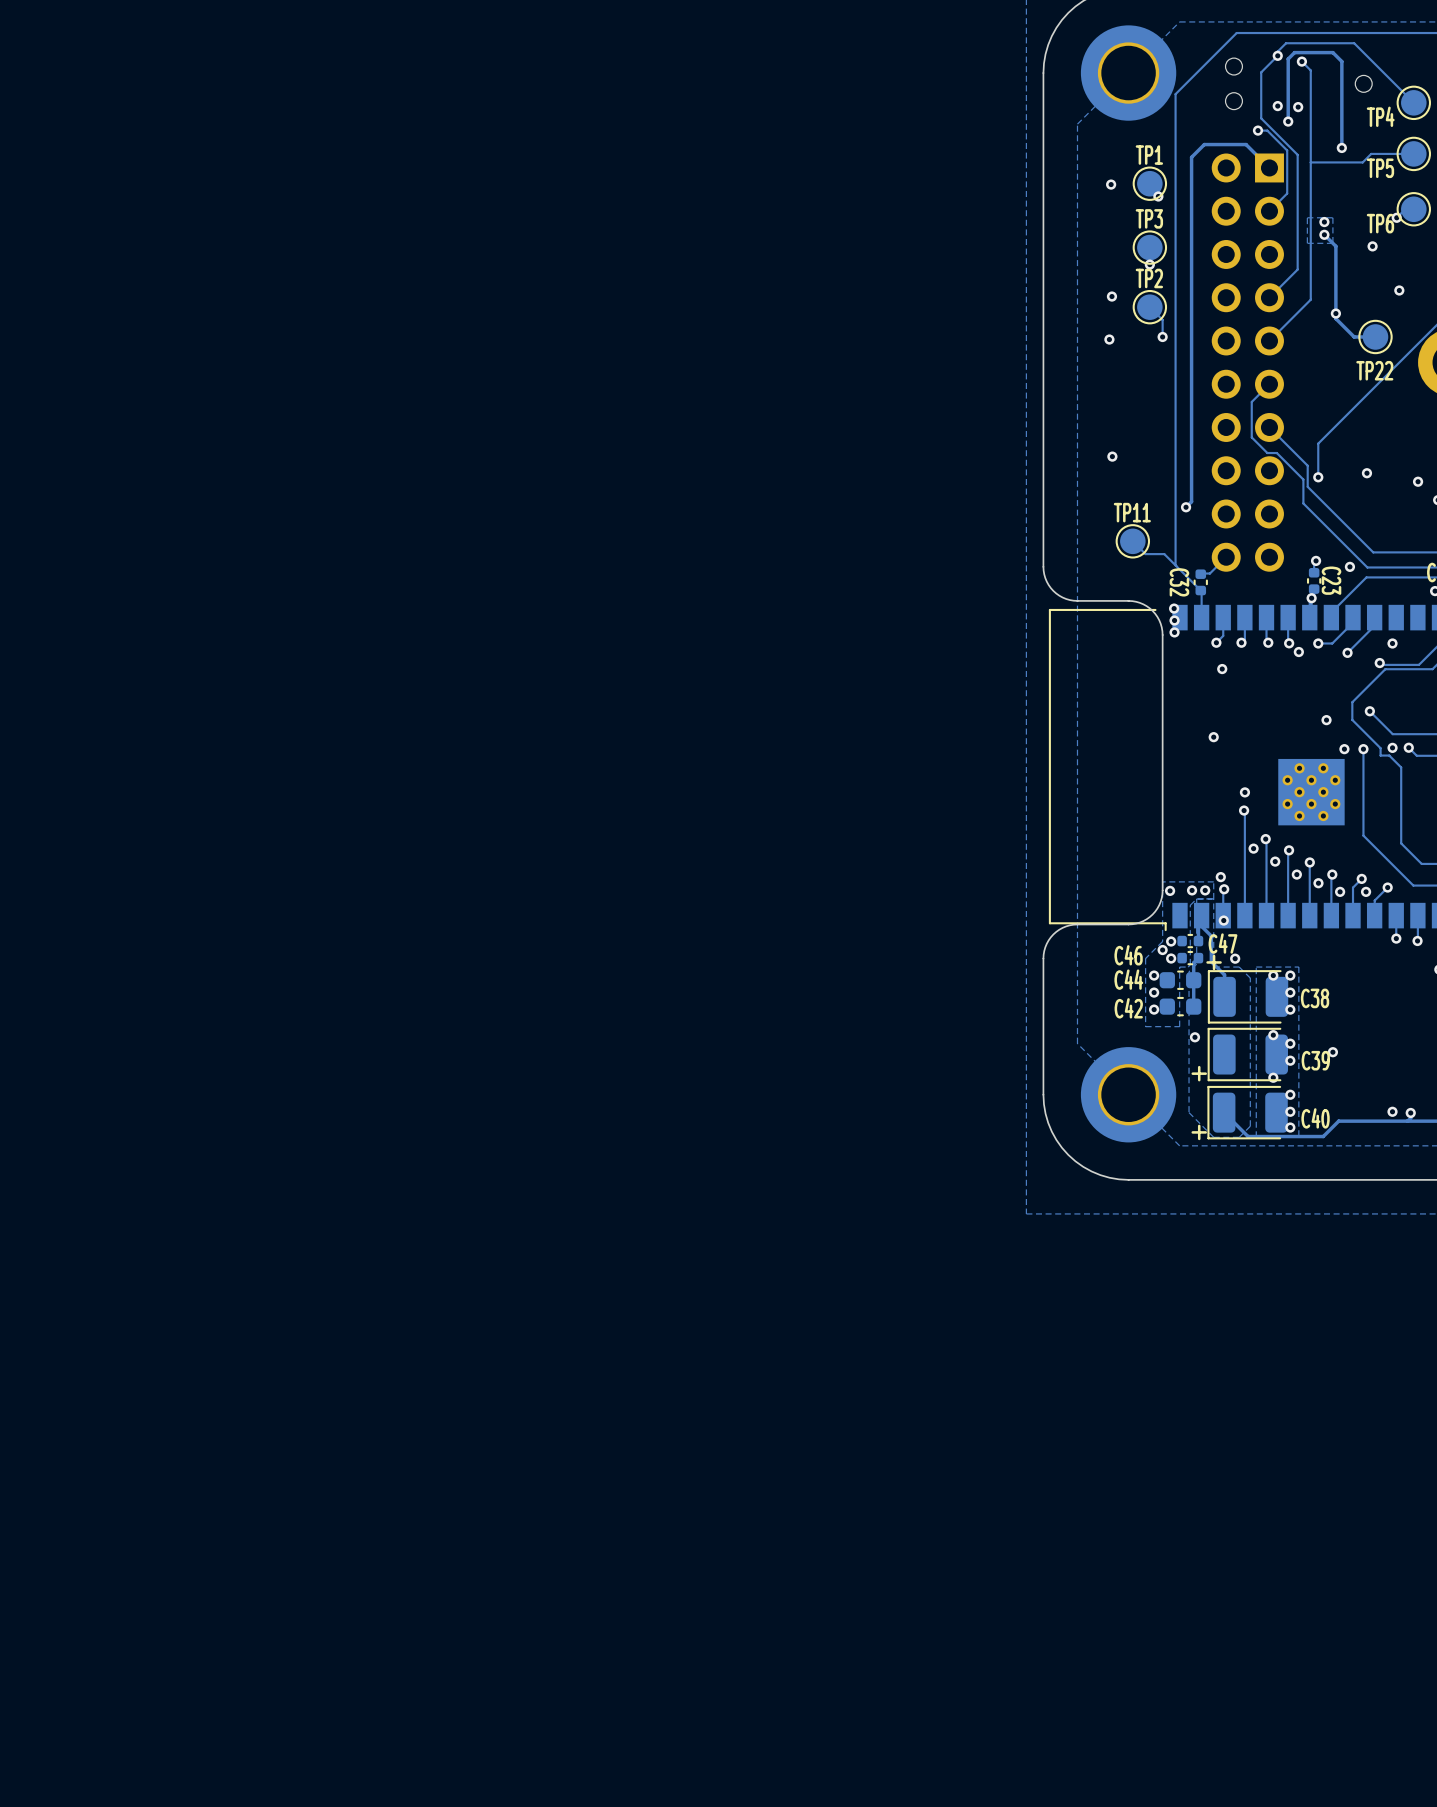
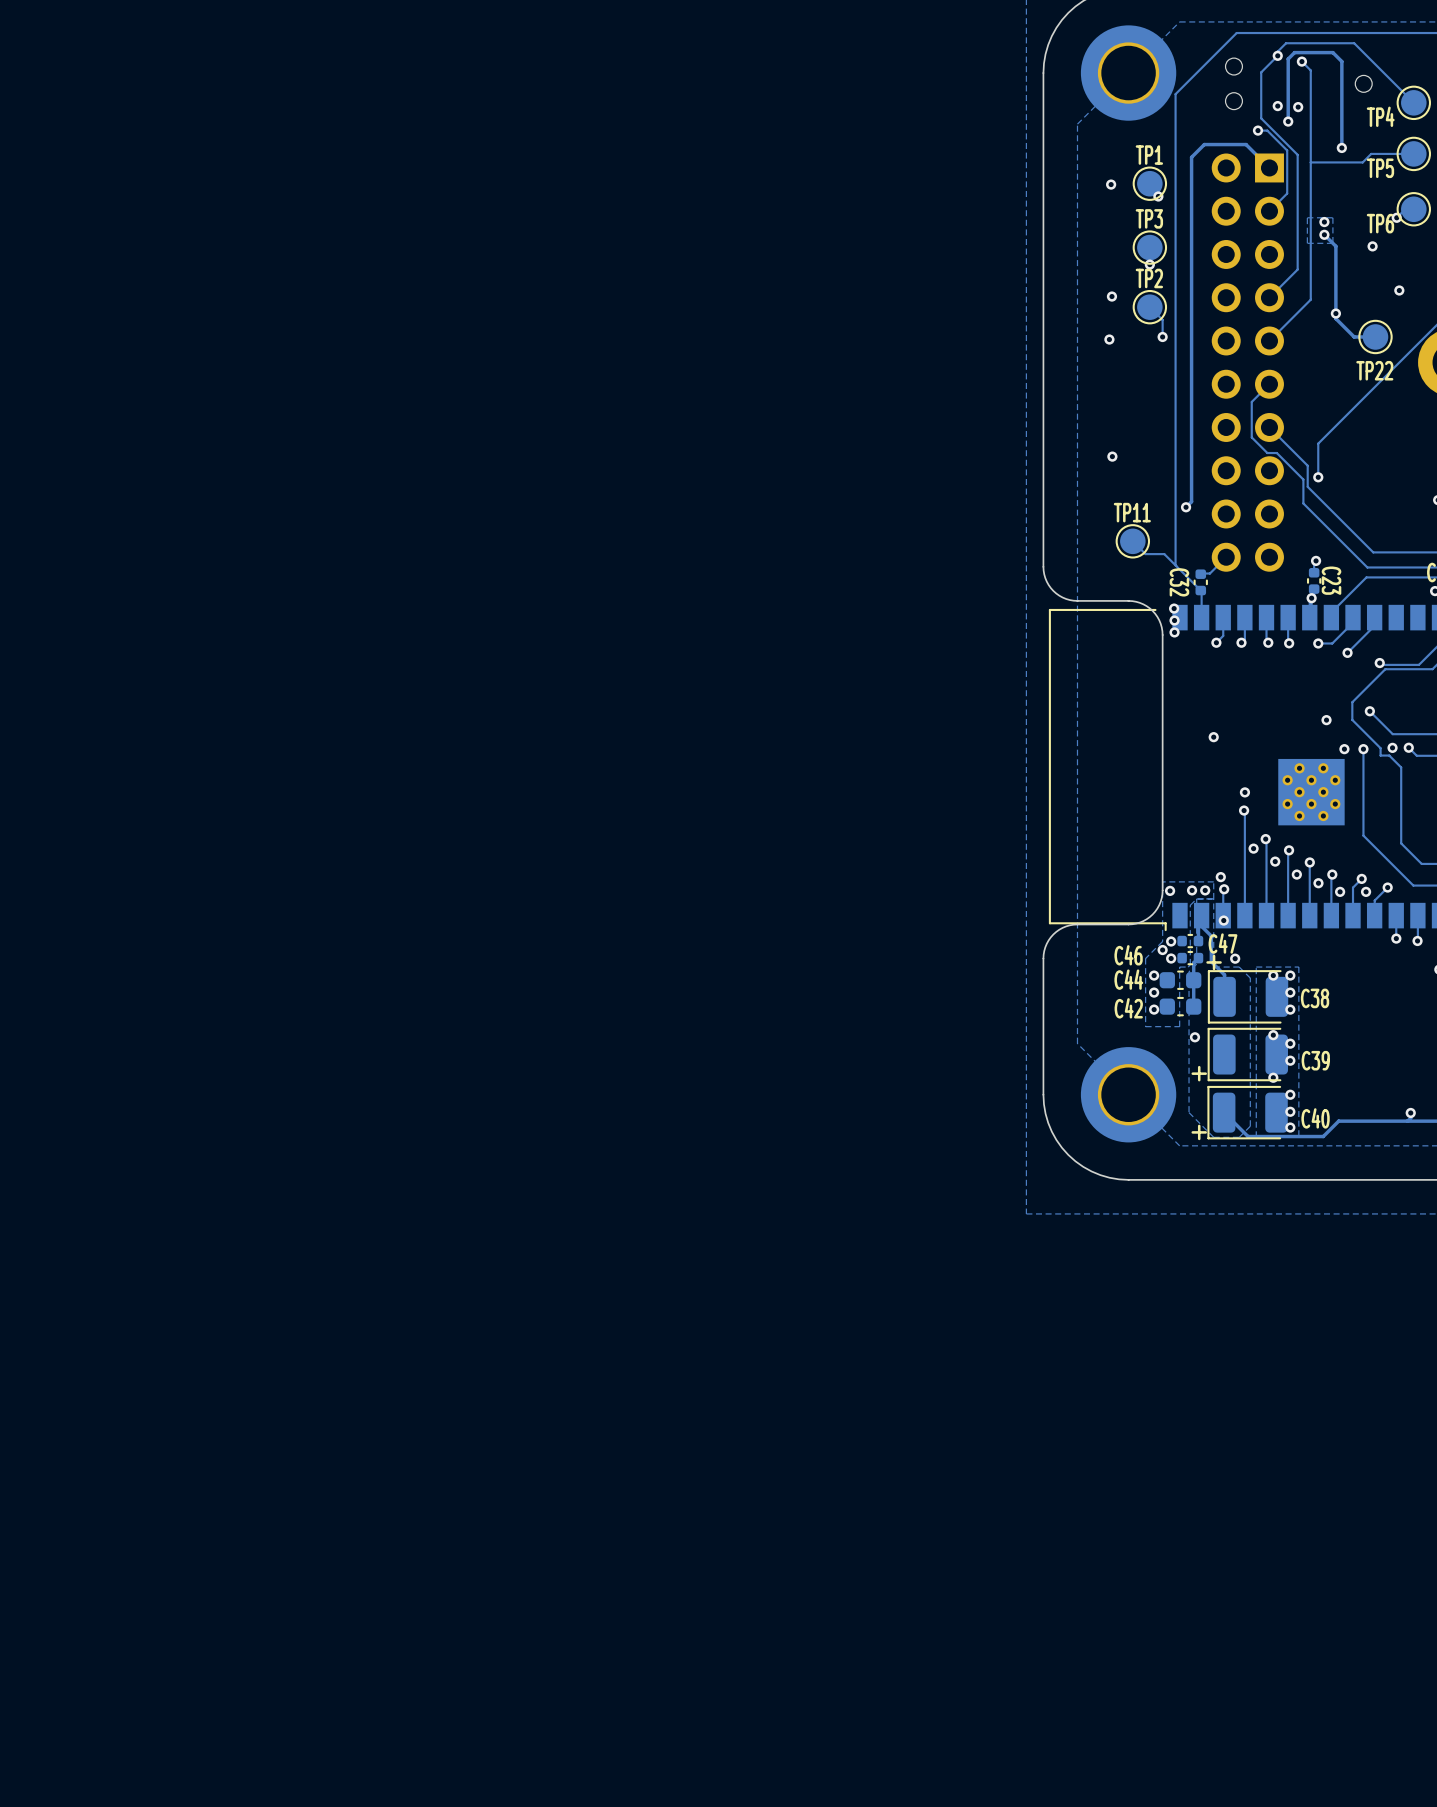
via: (1366, 473) -> none
via: (1418, 481) -> none
via: (1349, 566) -> none
via: (1392, 643) -> none
via: (1298, 652) -> none
via: (1222, 669) -> none
via: (1332, 1052) -> none
via: (1392, 1111) -> none

